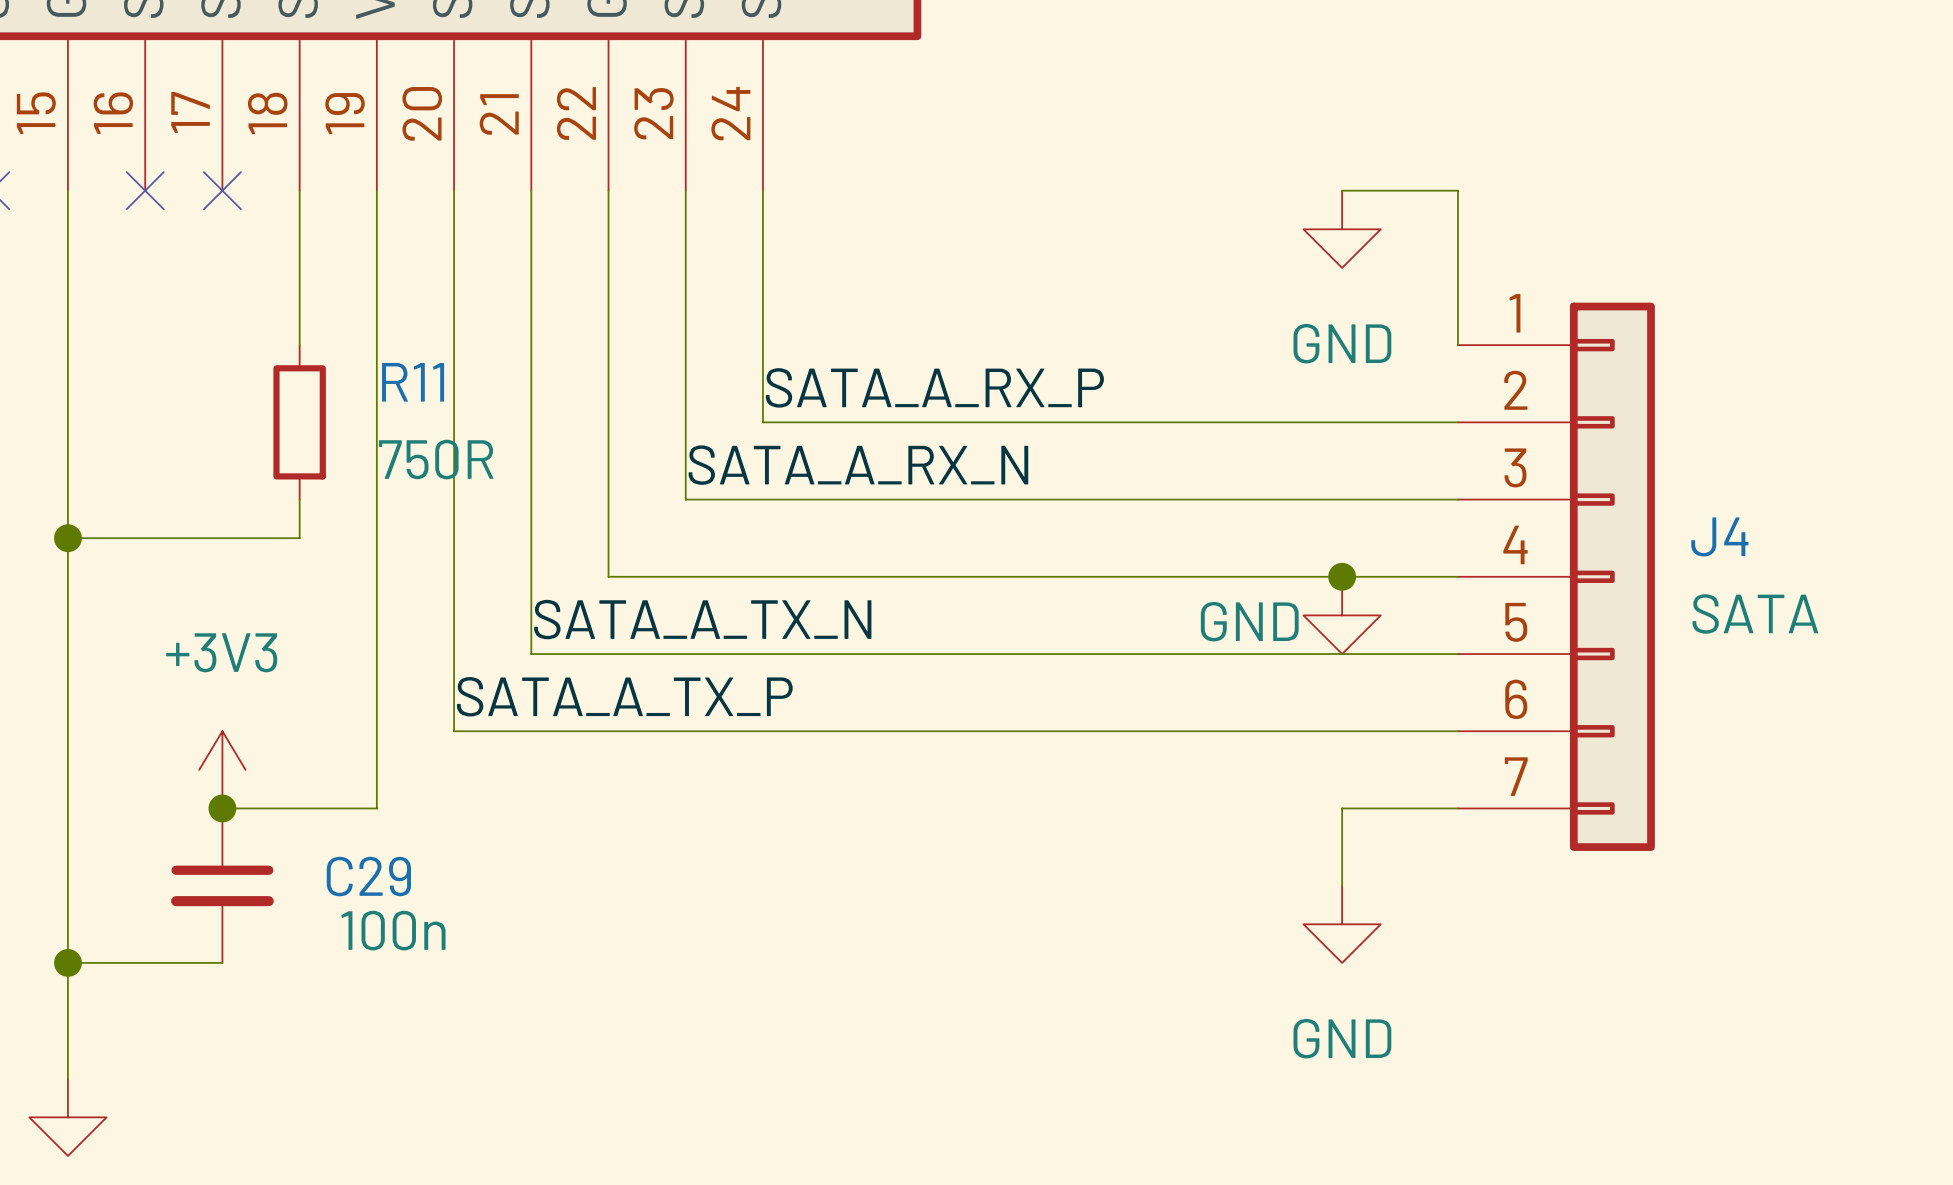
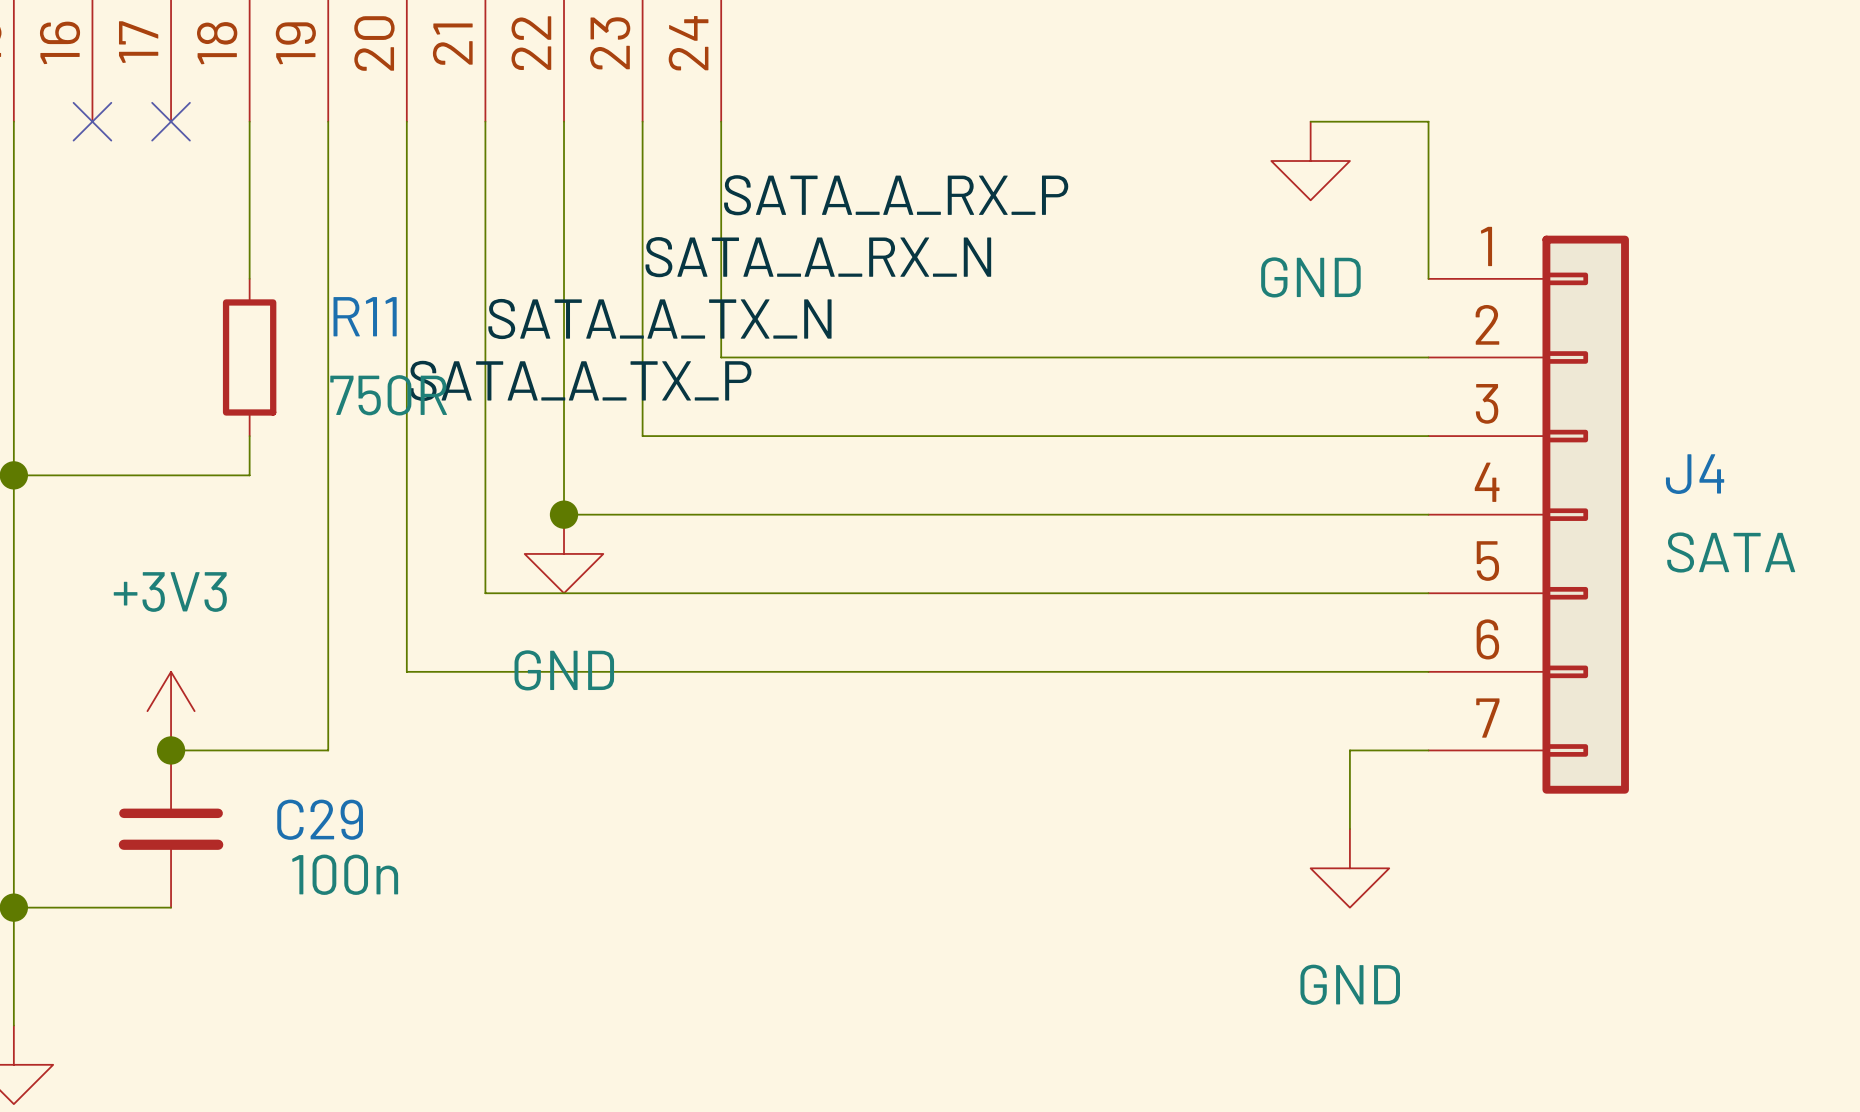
label position: SATA_A_RX_P (934, 387) -> SATA_A_RX_P (896, 195)
label position: SATA_A_RX_N (858, 465) -> SATA_A_RX_N (818, 257)
junction: none -> (564, 514)
junction: (1342, 576) -> none
power symbol: none -> GND (564, 553)
power symbol: GND (1342, 615) -> none
label position: SATA_A_TX_N (702, 619) -> SATA_A_TX_N (659, 319)
label position: SATA_A_TX_P (624, 696) -> SATA_A_TX_P (580, 380)
wire: (1380, 808) (1342, 808) (1342, 885) -> (1349, 750) (1349, 829)
power symbol position: GND (1342, 924) -> GND (1349, 868)

